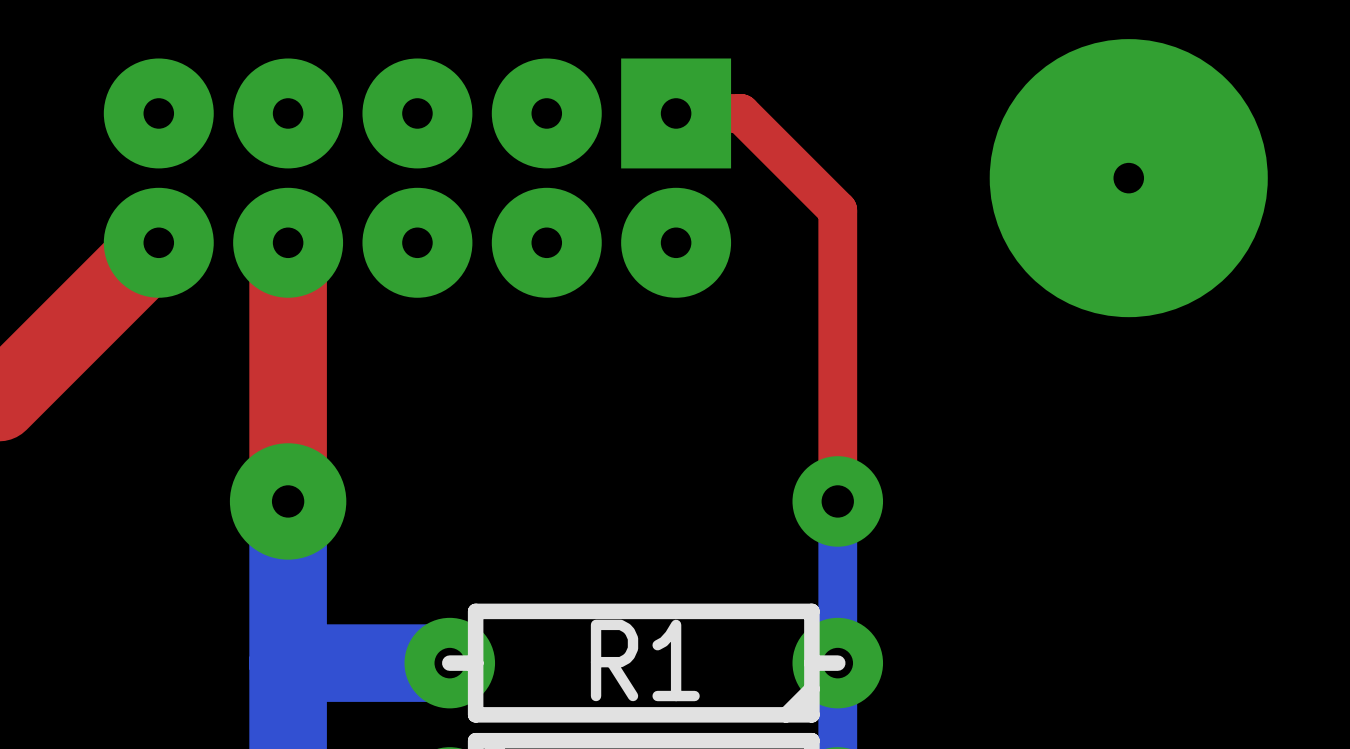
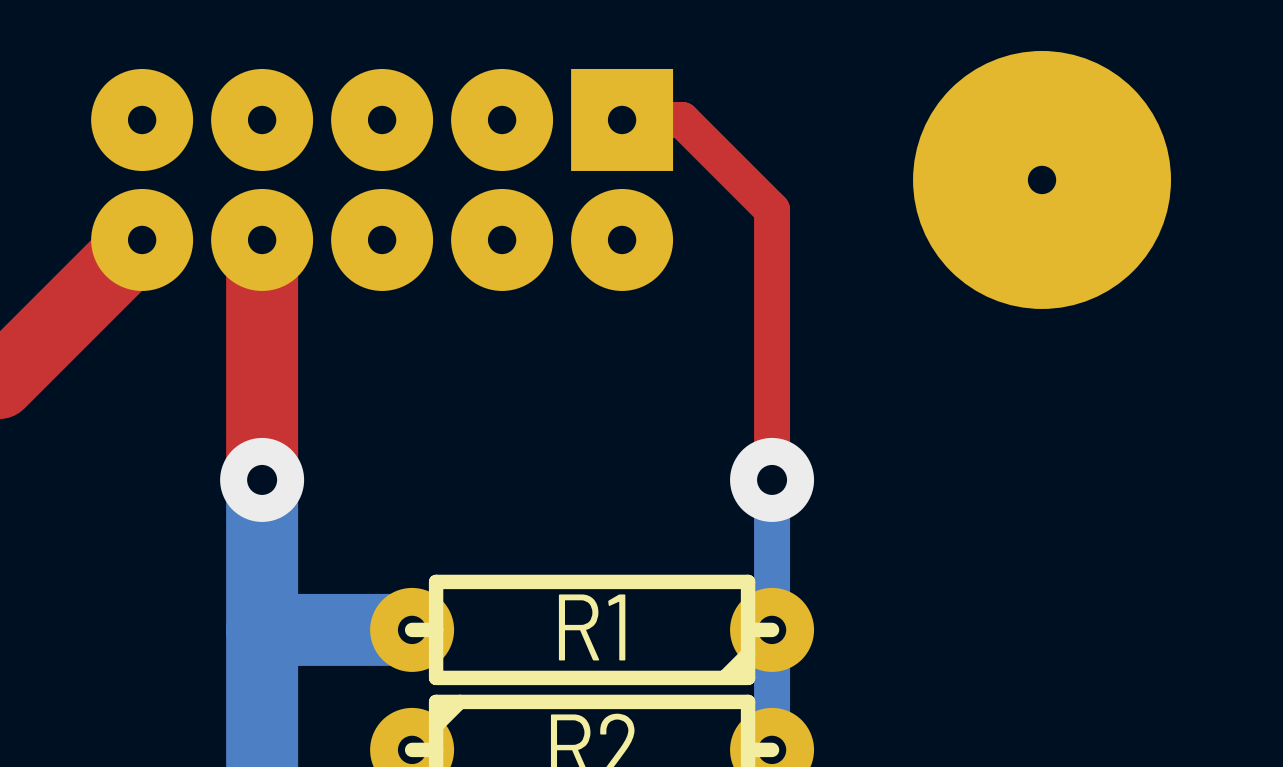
via size: [229, 443, 347, 560] -> [220, 437, 305, 522]

